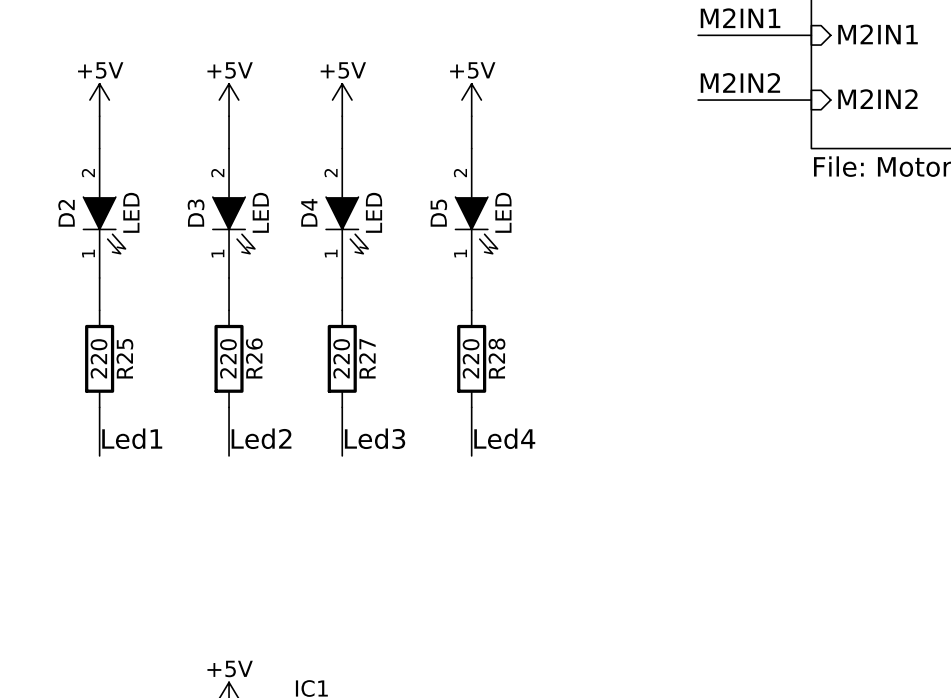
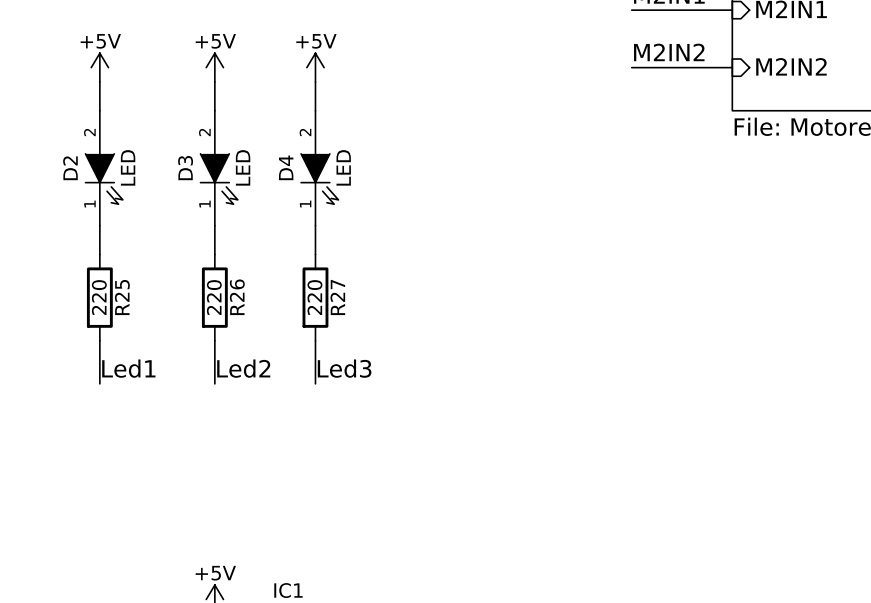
power symbol: +5V (471, 100) -> none
wire: (471, 116) (471, 148) -> none
D5: LED (476, 213) -> none
wire: (471, 277) (471, 310) -> none
R28: 220 (471, 358) -> none
wire: (471, 407) (471, 455) -> none
label: Led4 (504, 438) -> none

